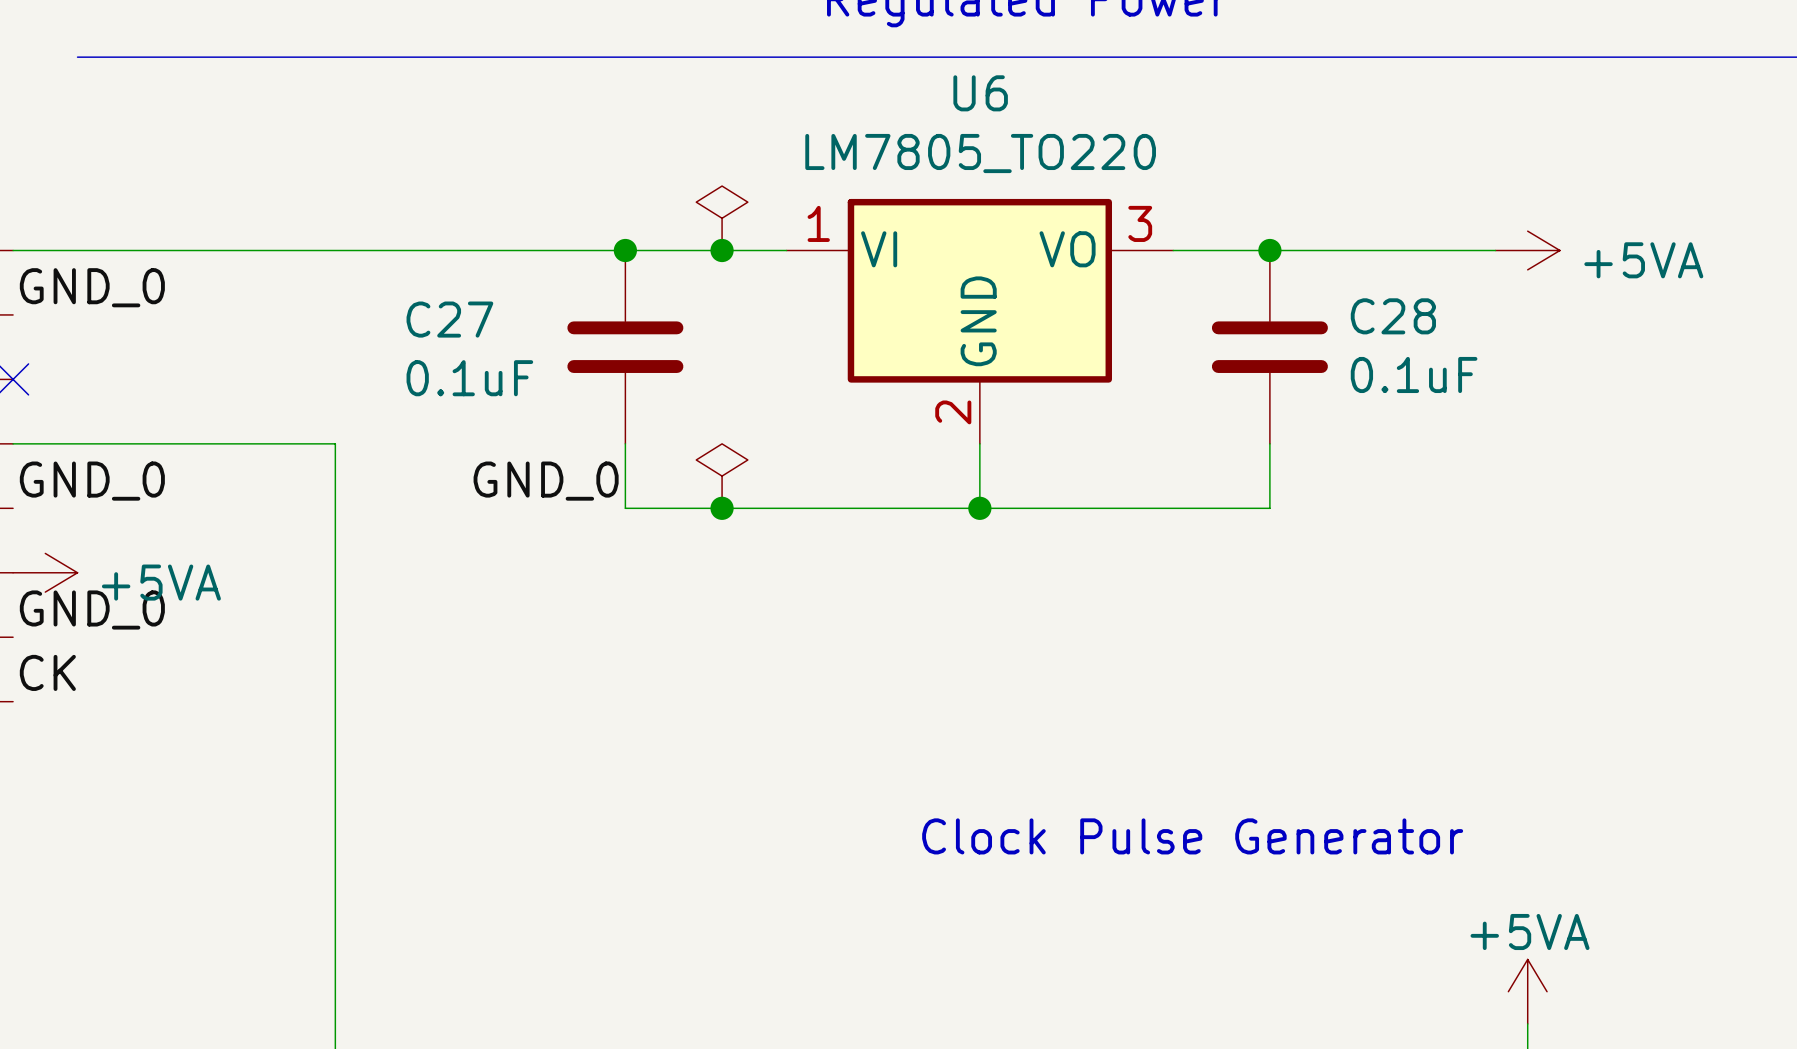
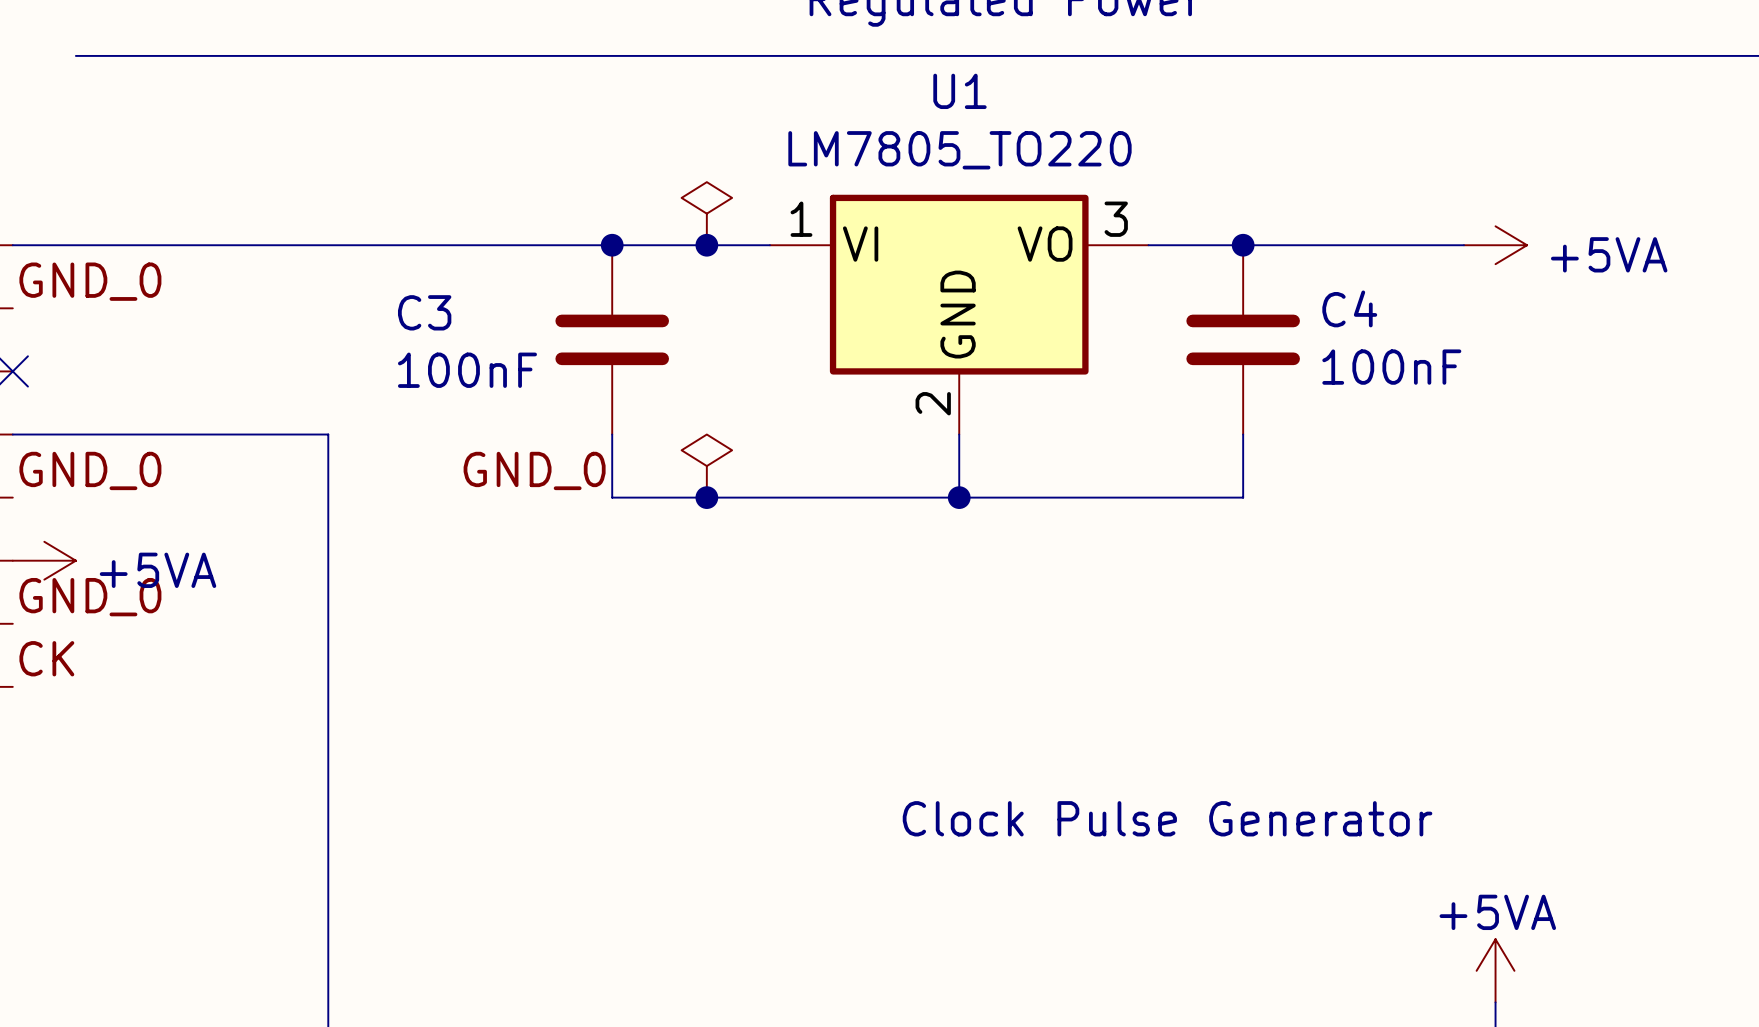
U6 name: U6 (980, 93) -> U1 (959, 91)
C28 name: C28 (1393, 316) -> C4 (1349, 308)
C27 name: C27 (449, 319) -> C3 (424, 312)
C28 value: 0.1uF (1414, 374) -> 100nF (1391, 367)
C27 value: 0.1uF (469, 378) -> 100nF (467, 370)

